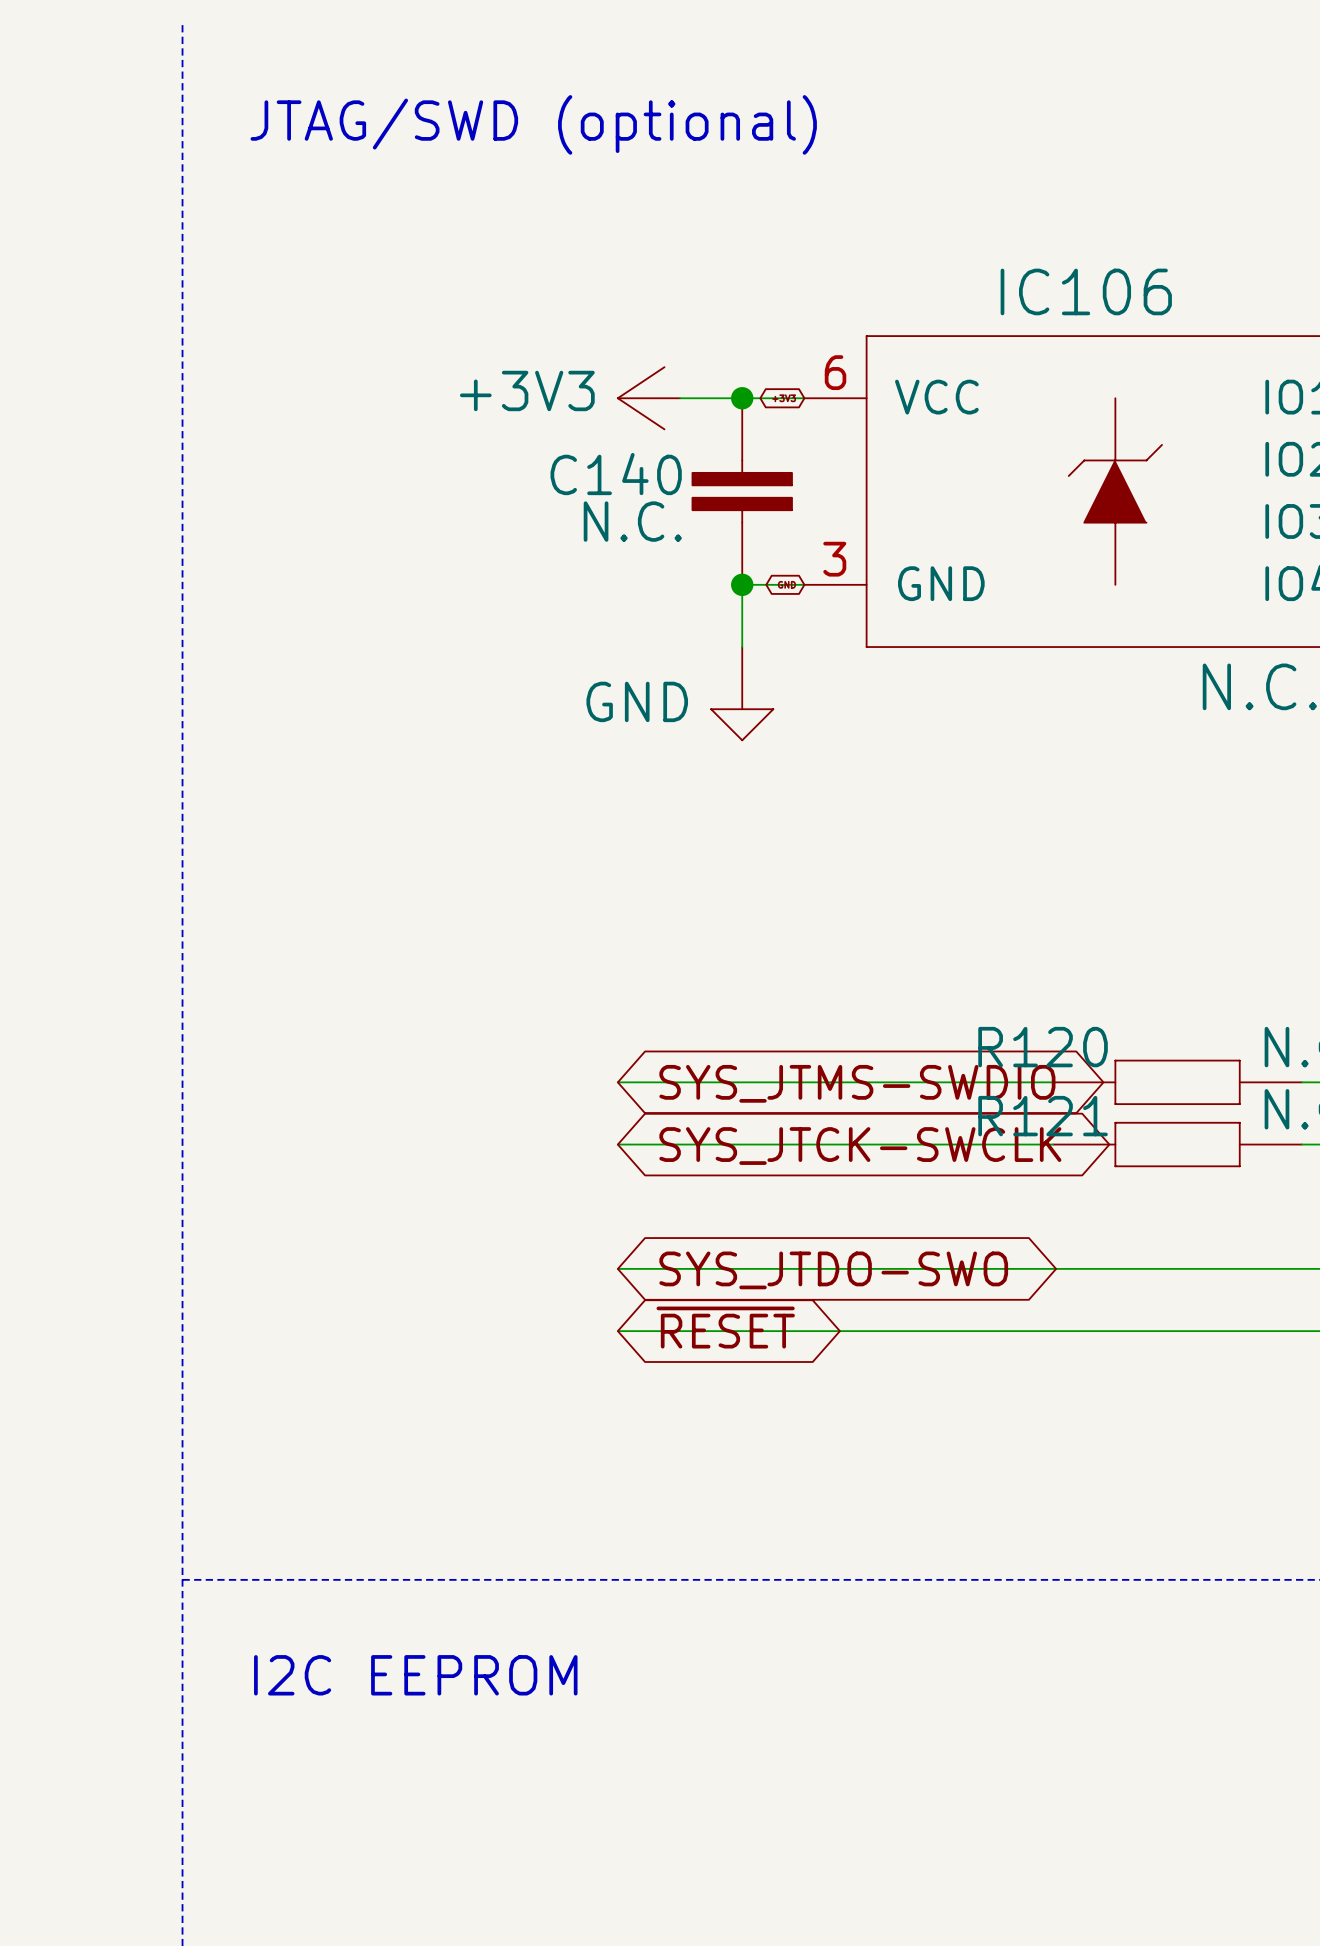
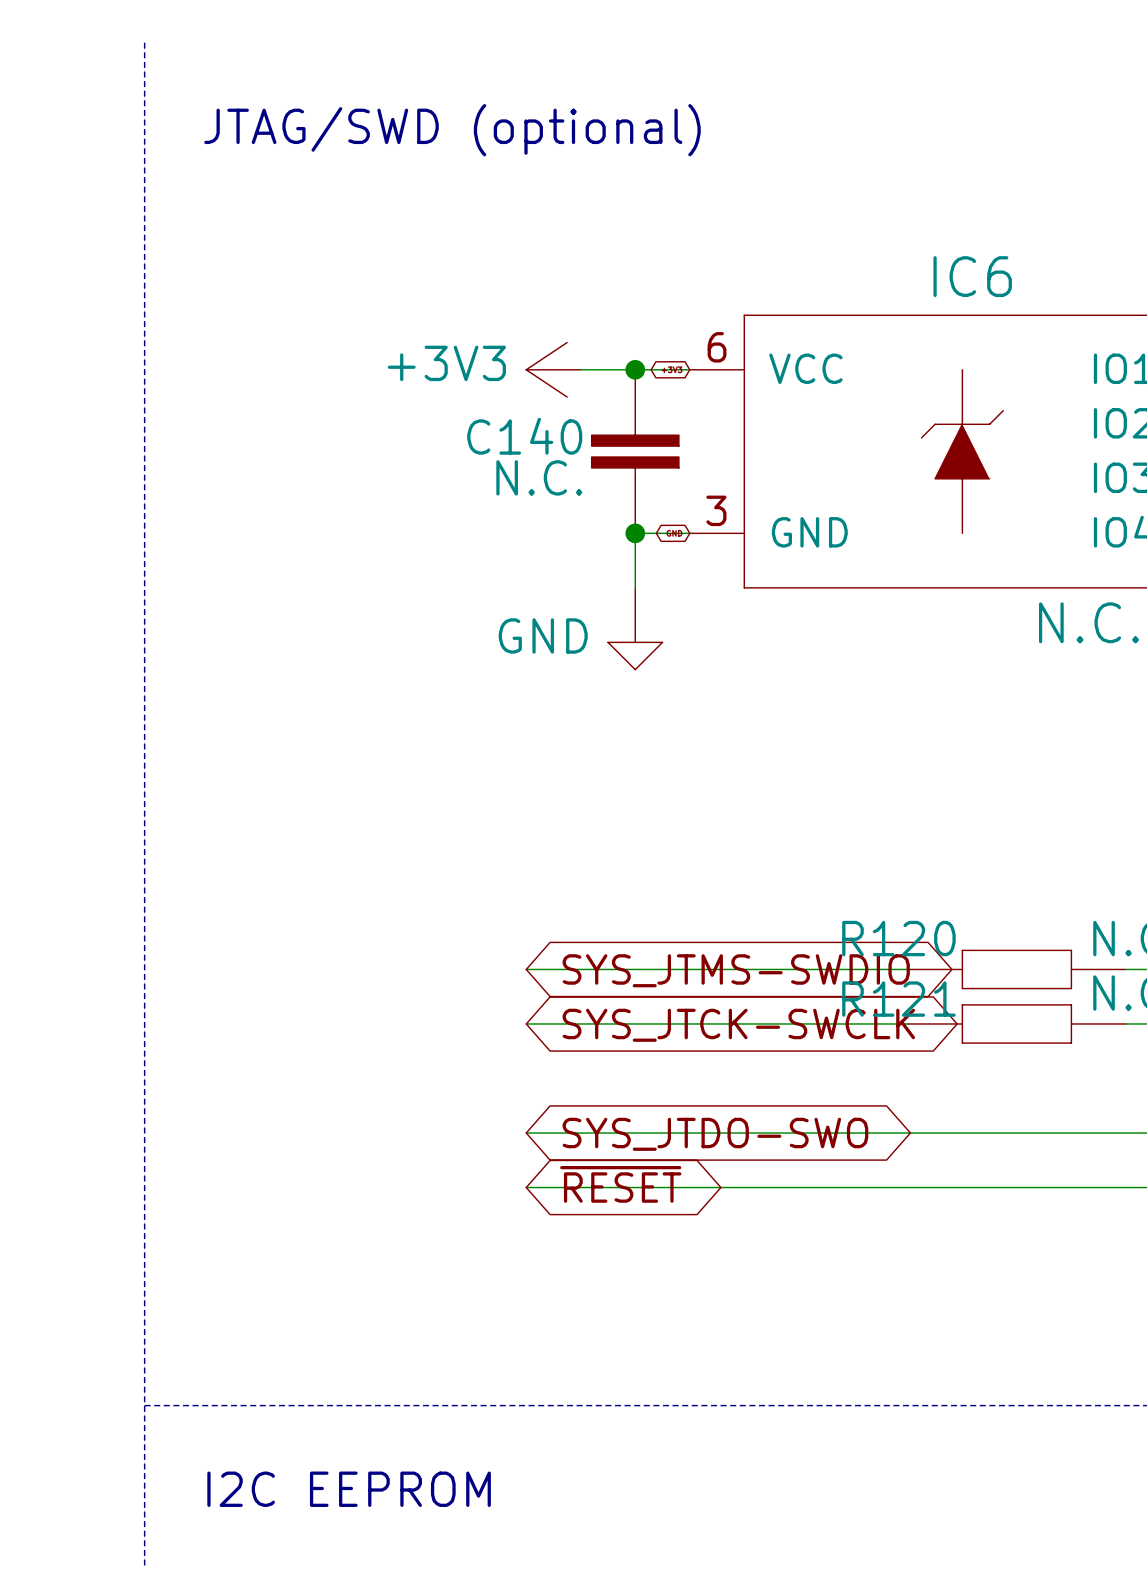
IC106 name: IC106 (1086, 291) -> IC6 (972, 276)

